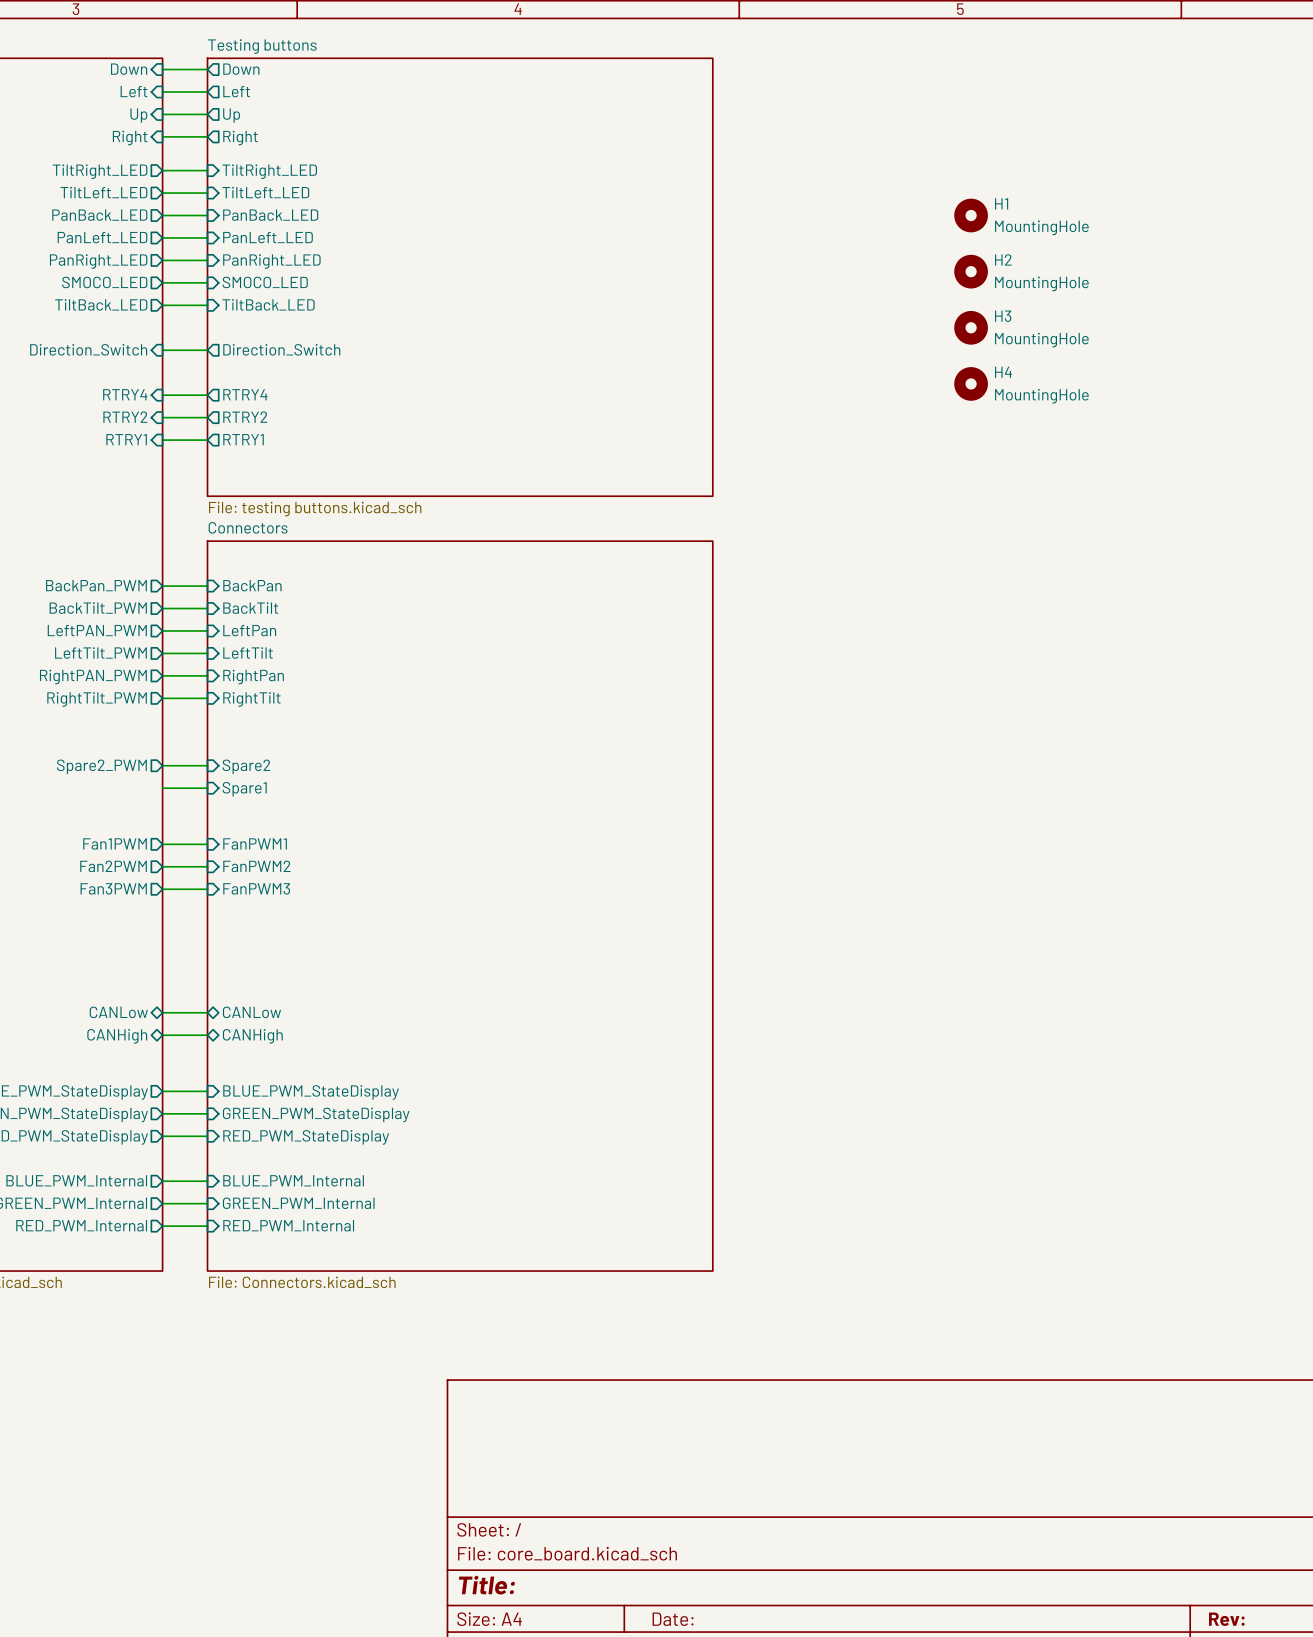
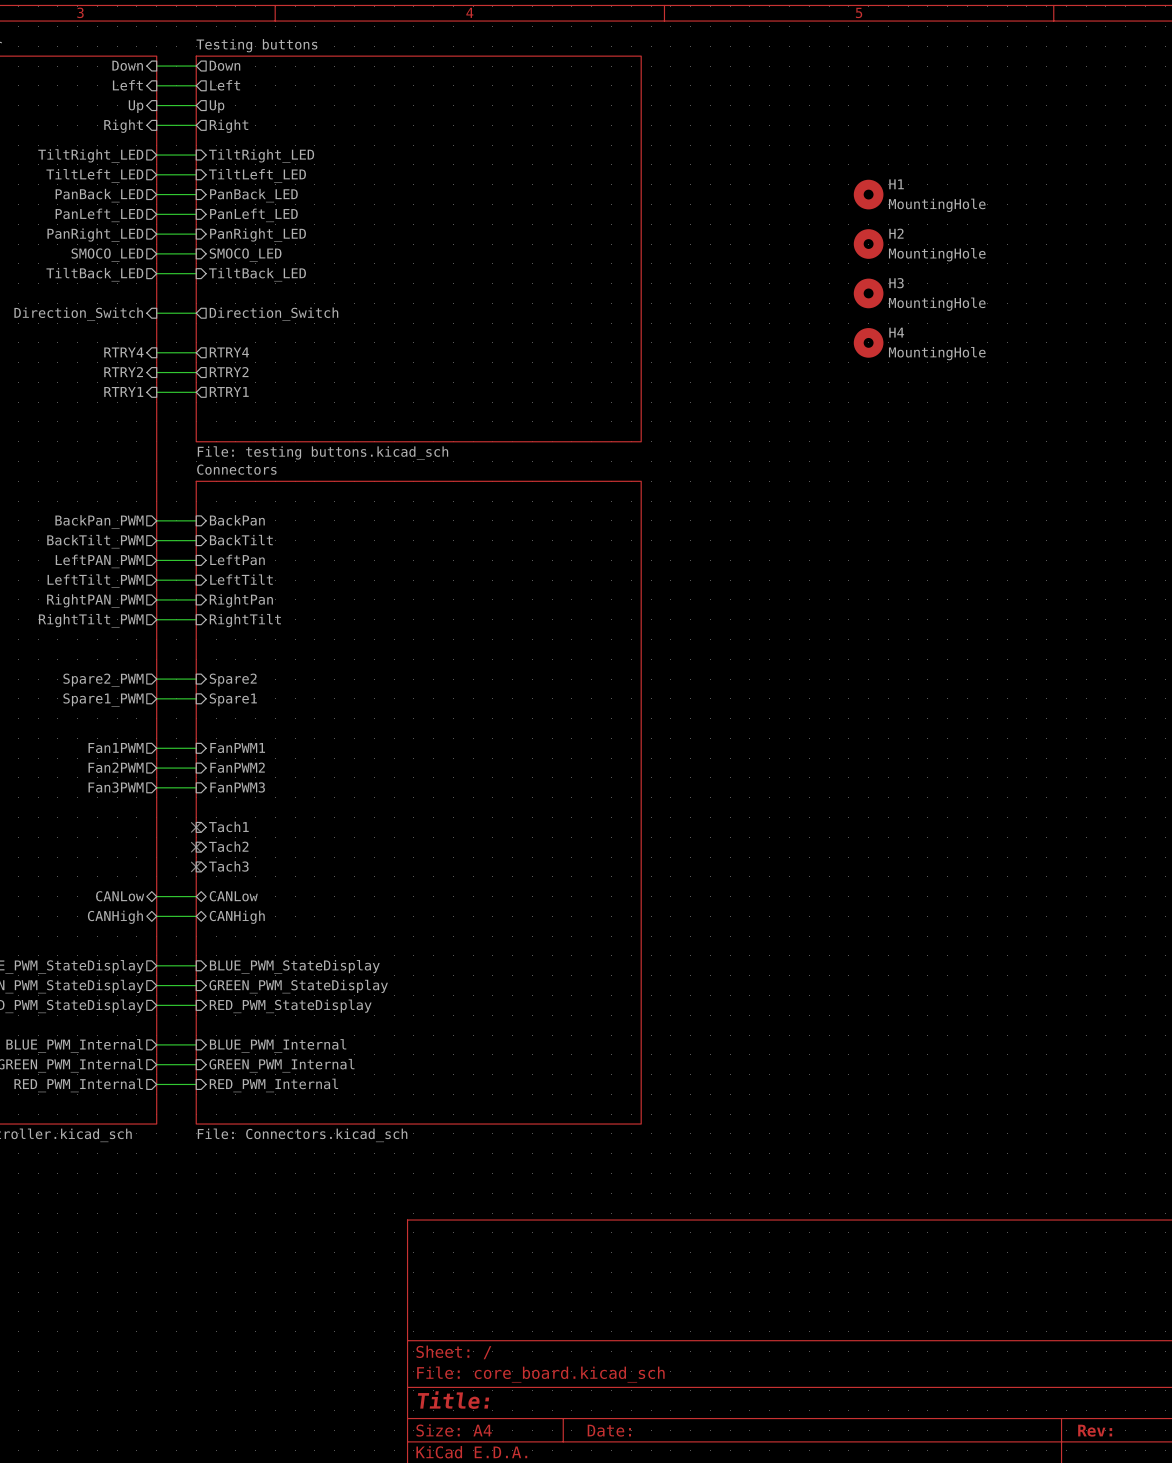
sheet pin: none -> Spare1_PWM (103, 699)
sheet pin: none -> Tach1 (228, 826)
no-connect mark: none -> (196, 827)
no-connect mark: none -> (196, 847)
sheet pin: none -> Tach2 (228, 846)
sheet pin: none -> Tach3 (228, 866)
no-connect mark: none -> (196, 866)

